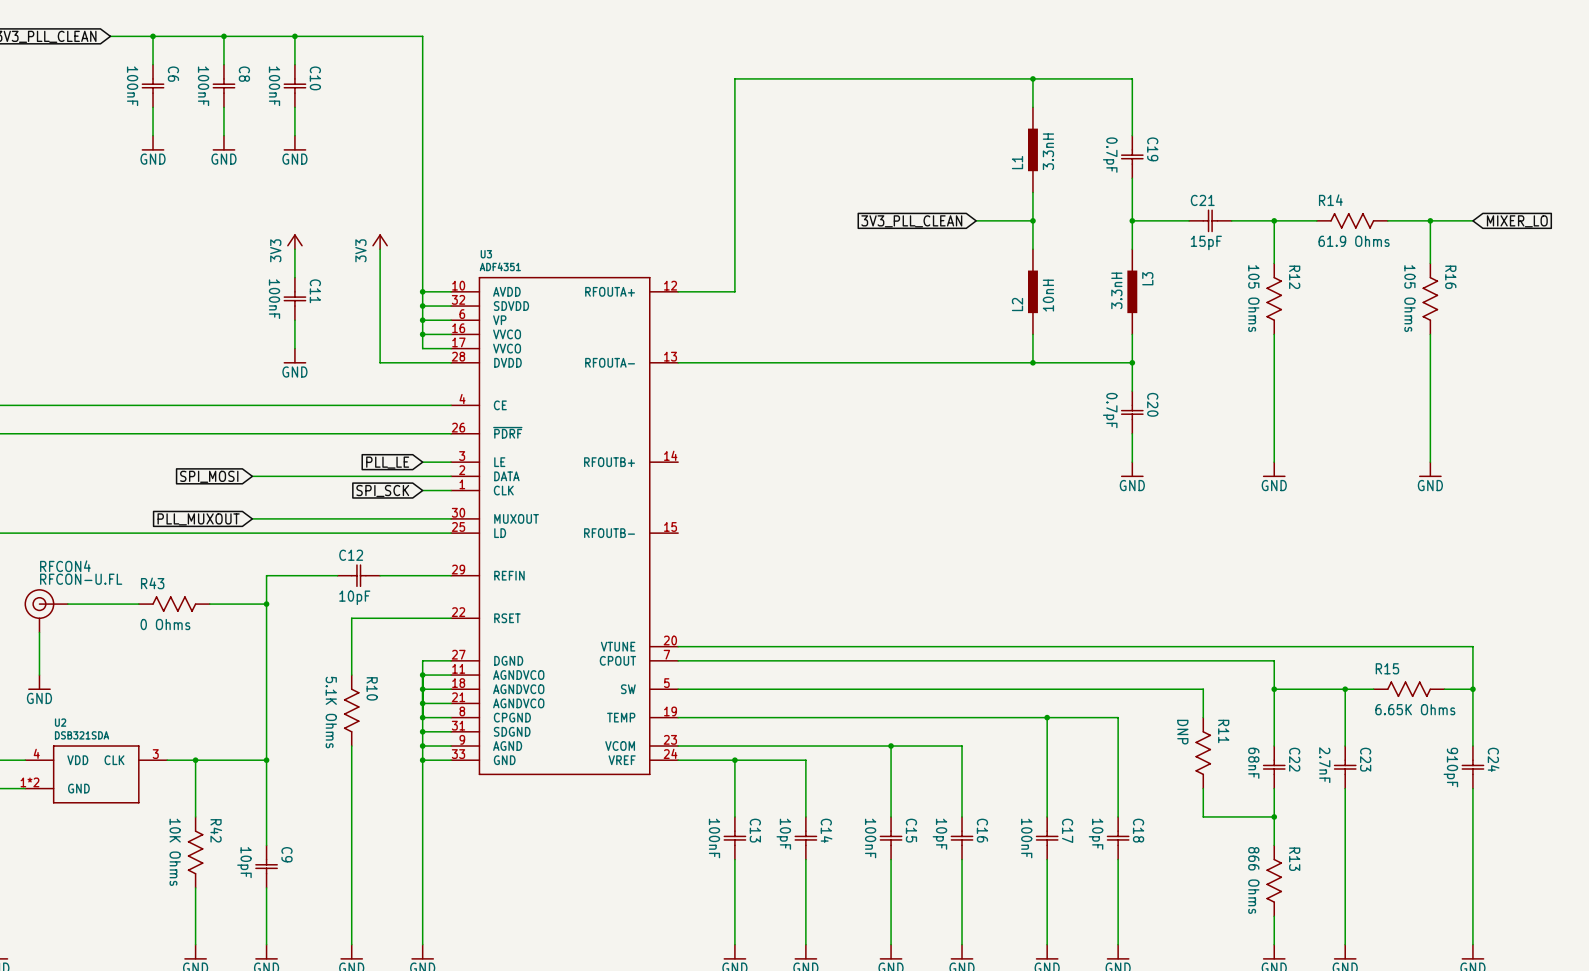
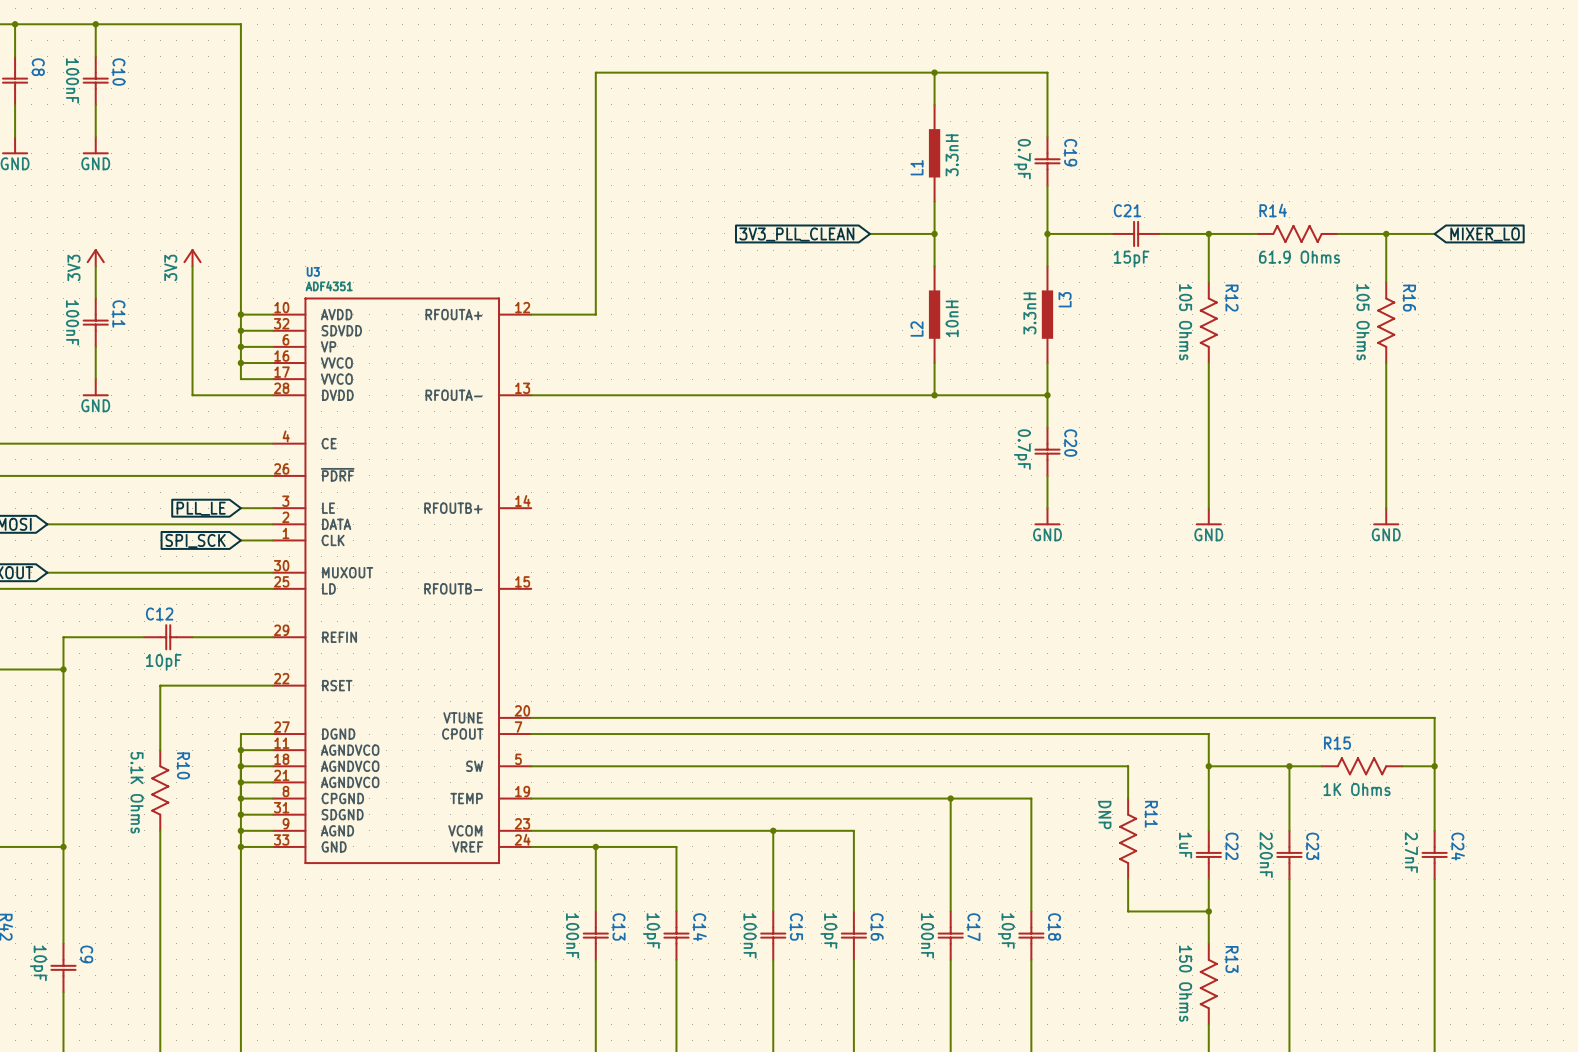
R15 value: 6.65K Ohms (1415, 709) -> 1K Ohms (1357, 789)
C22 value: 68nF (1253, 763) -> 1uF (1185, 845)
C23 value: 2.7nF (1324, 765) -> 220nF (1266, 855)
C24 value: 910pF (1450, 767) -> 2.7nF (1411, 852)
R13 value: 866 Ohms (1253, 880) -> 150 Ohms (1185, 983)

